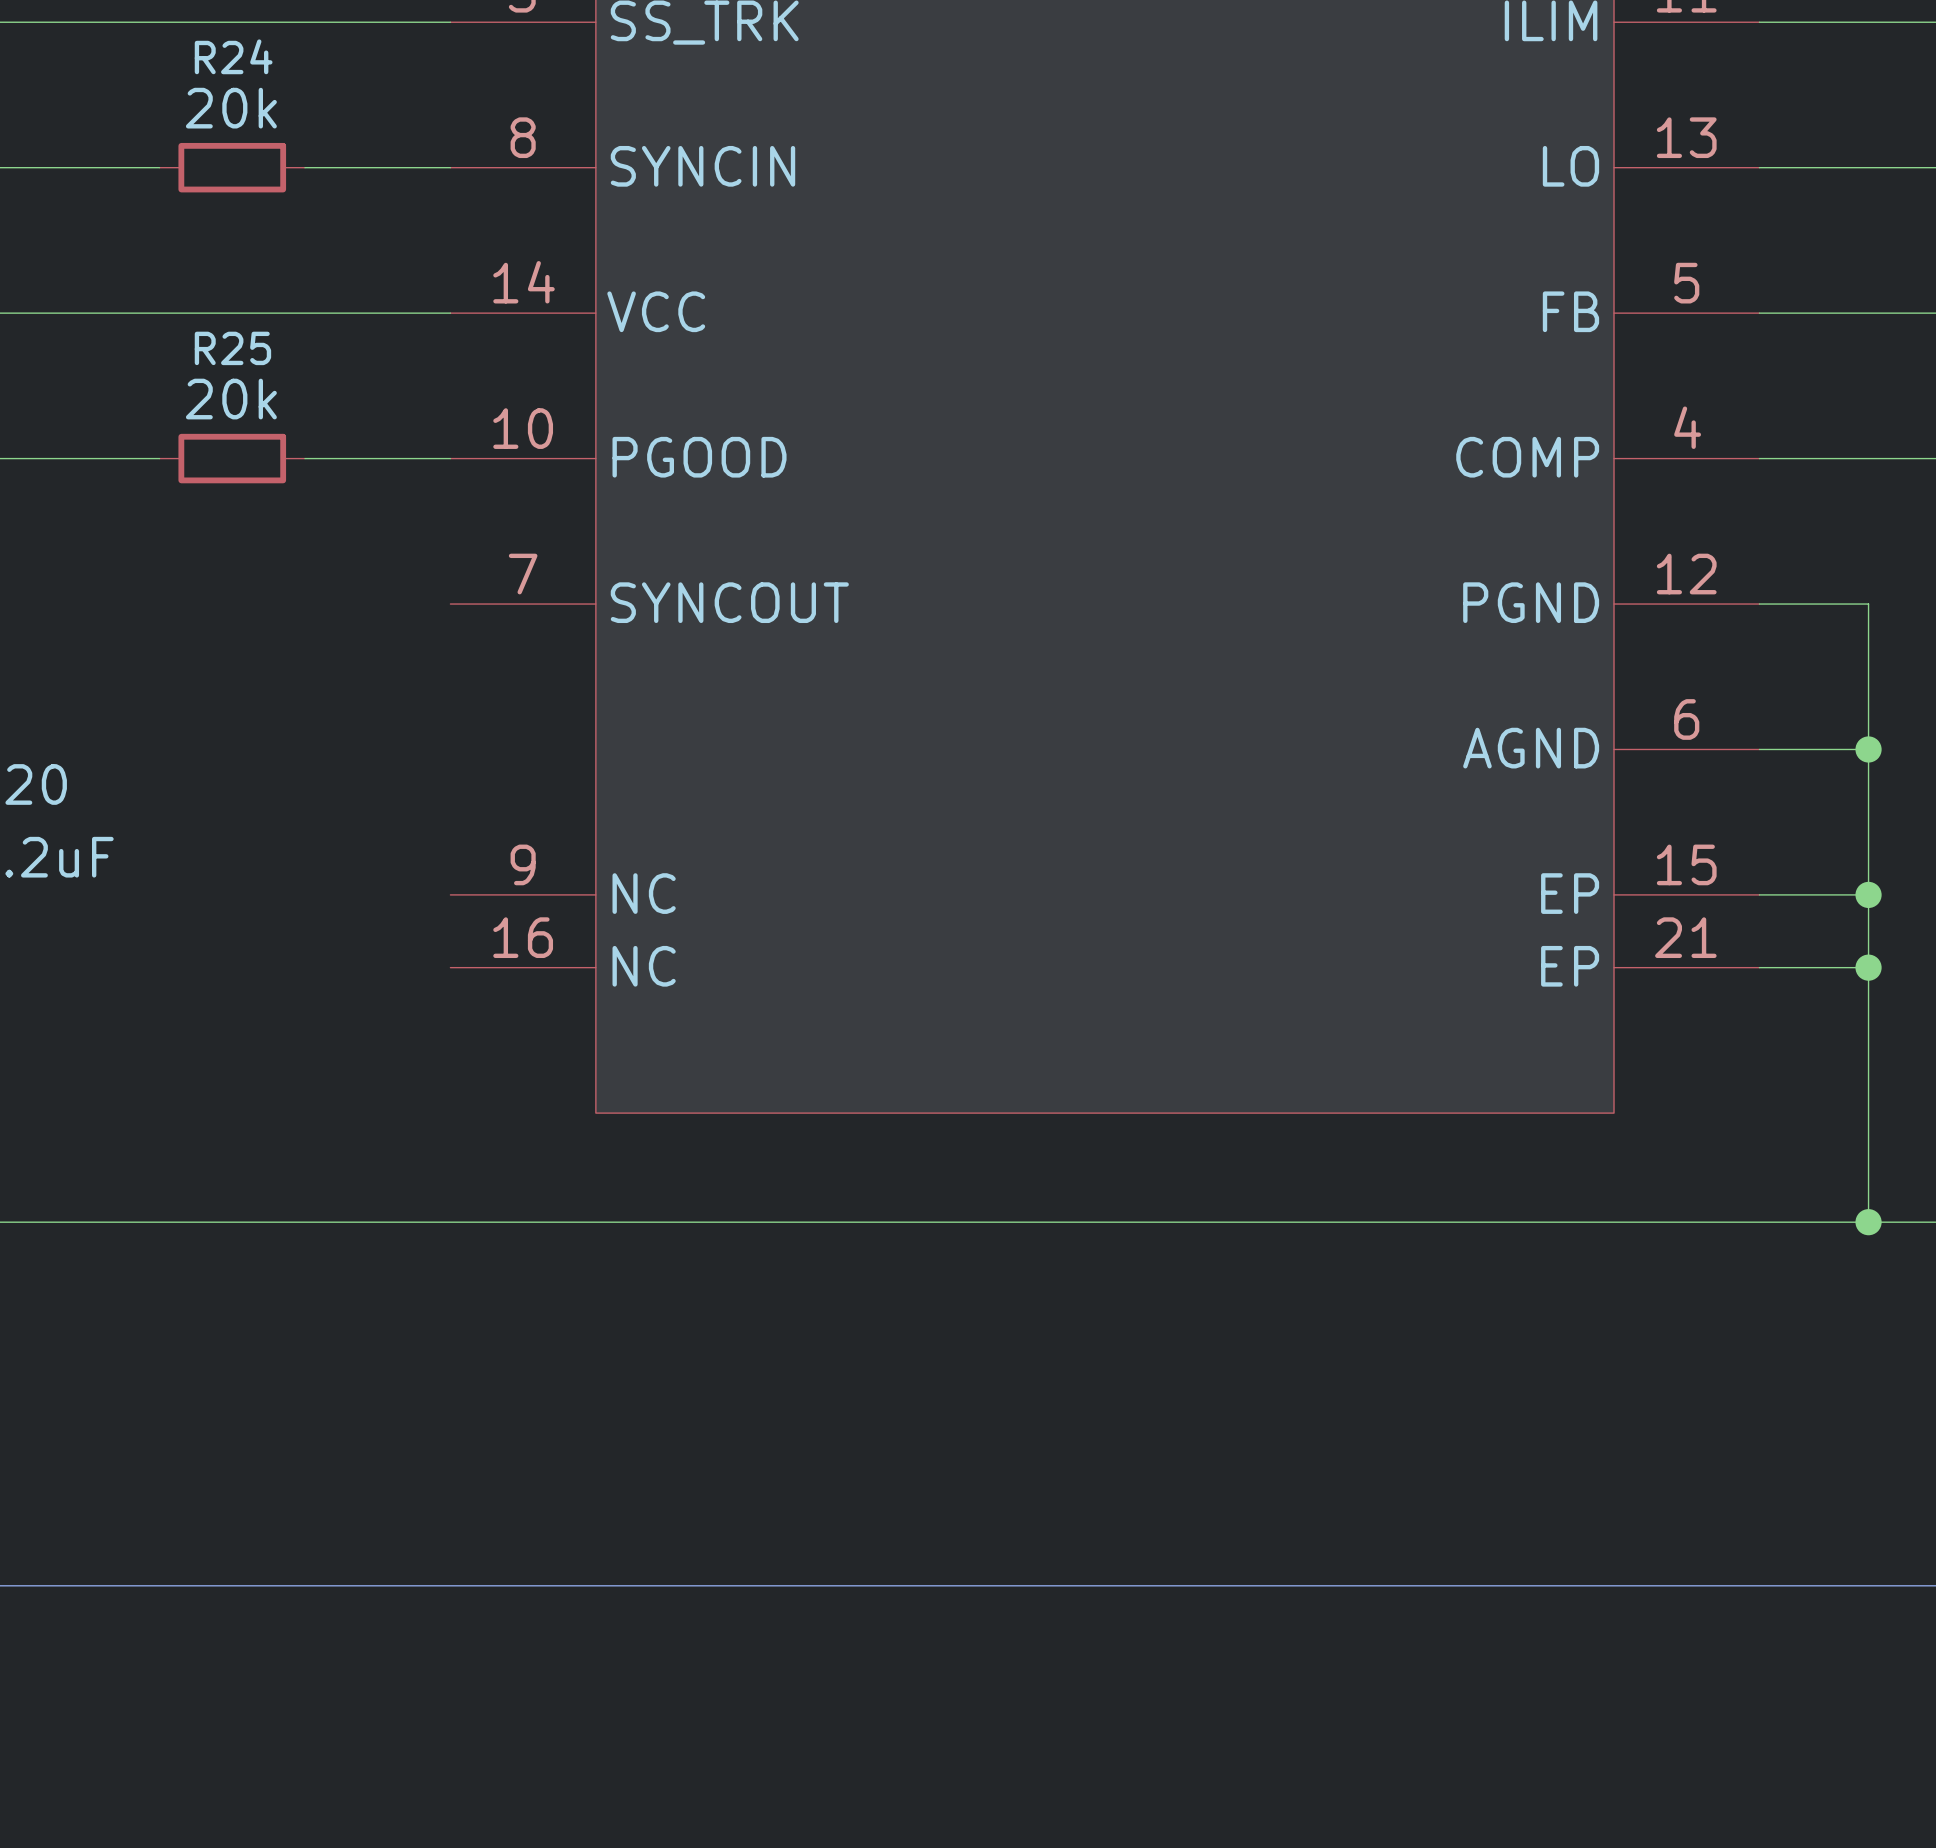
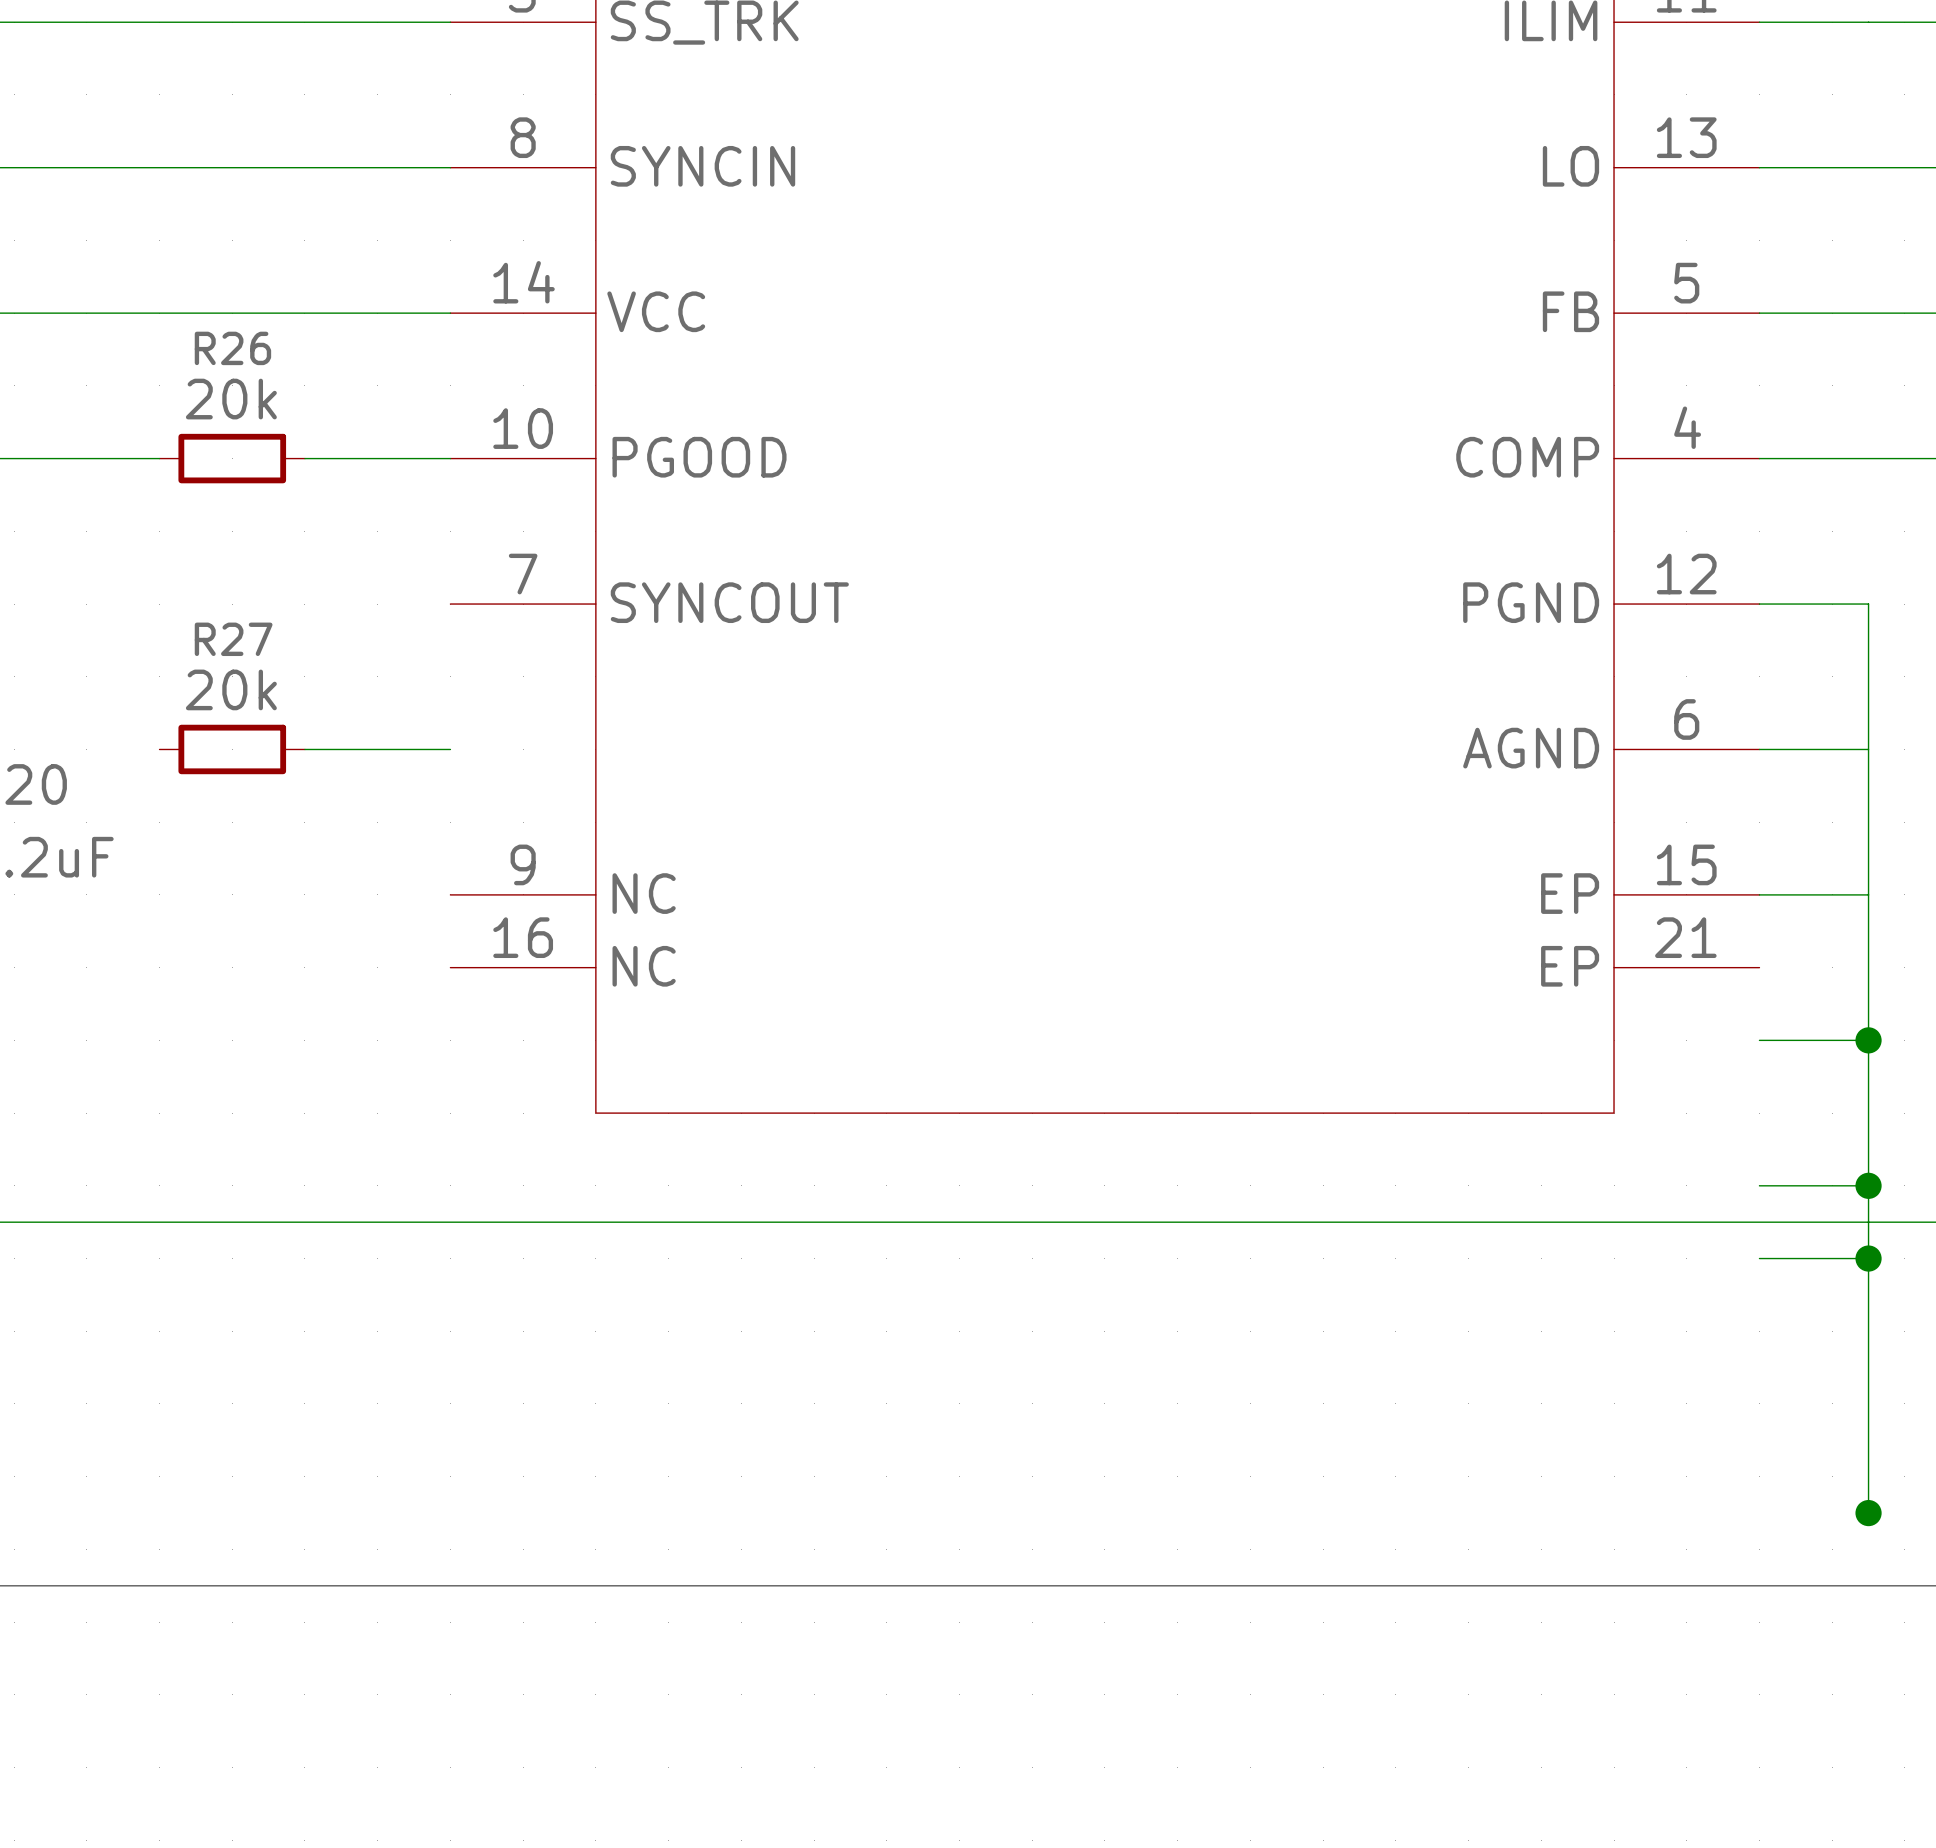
wire: none -> (159, 167) (304, 167)
R24: 20k (232, 167) -> none
R25 name: R25 (232, 348) -> R26 (232, 348)
R27: none -> 20k (232, 749)
wire: none -> (304, 749) (450, 749)
junction: (1868, 749) -> none
junction: (1868, 894) -> none
wire: (1759, 967) (1868, 967) -> (1759, 1258) (1868, 1258)
junction: (1868, 967) -> none
wire: none -> (1759, 1040) (1868, 1040)
junction: none -> (1868, 1040)
wire: none -> (1759, 1185) (1868, 1185)
junction: none -> (1868, 1185)
wire: none -> (1868, 1222) (1868, 1513)
junction: (1868, 1222) -> none
junction: none -> (1868, 1258)
junction: none -> (1868, 1513)

